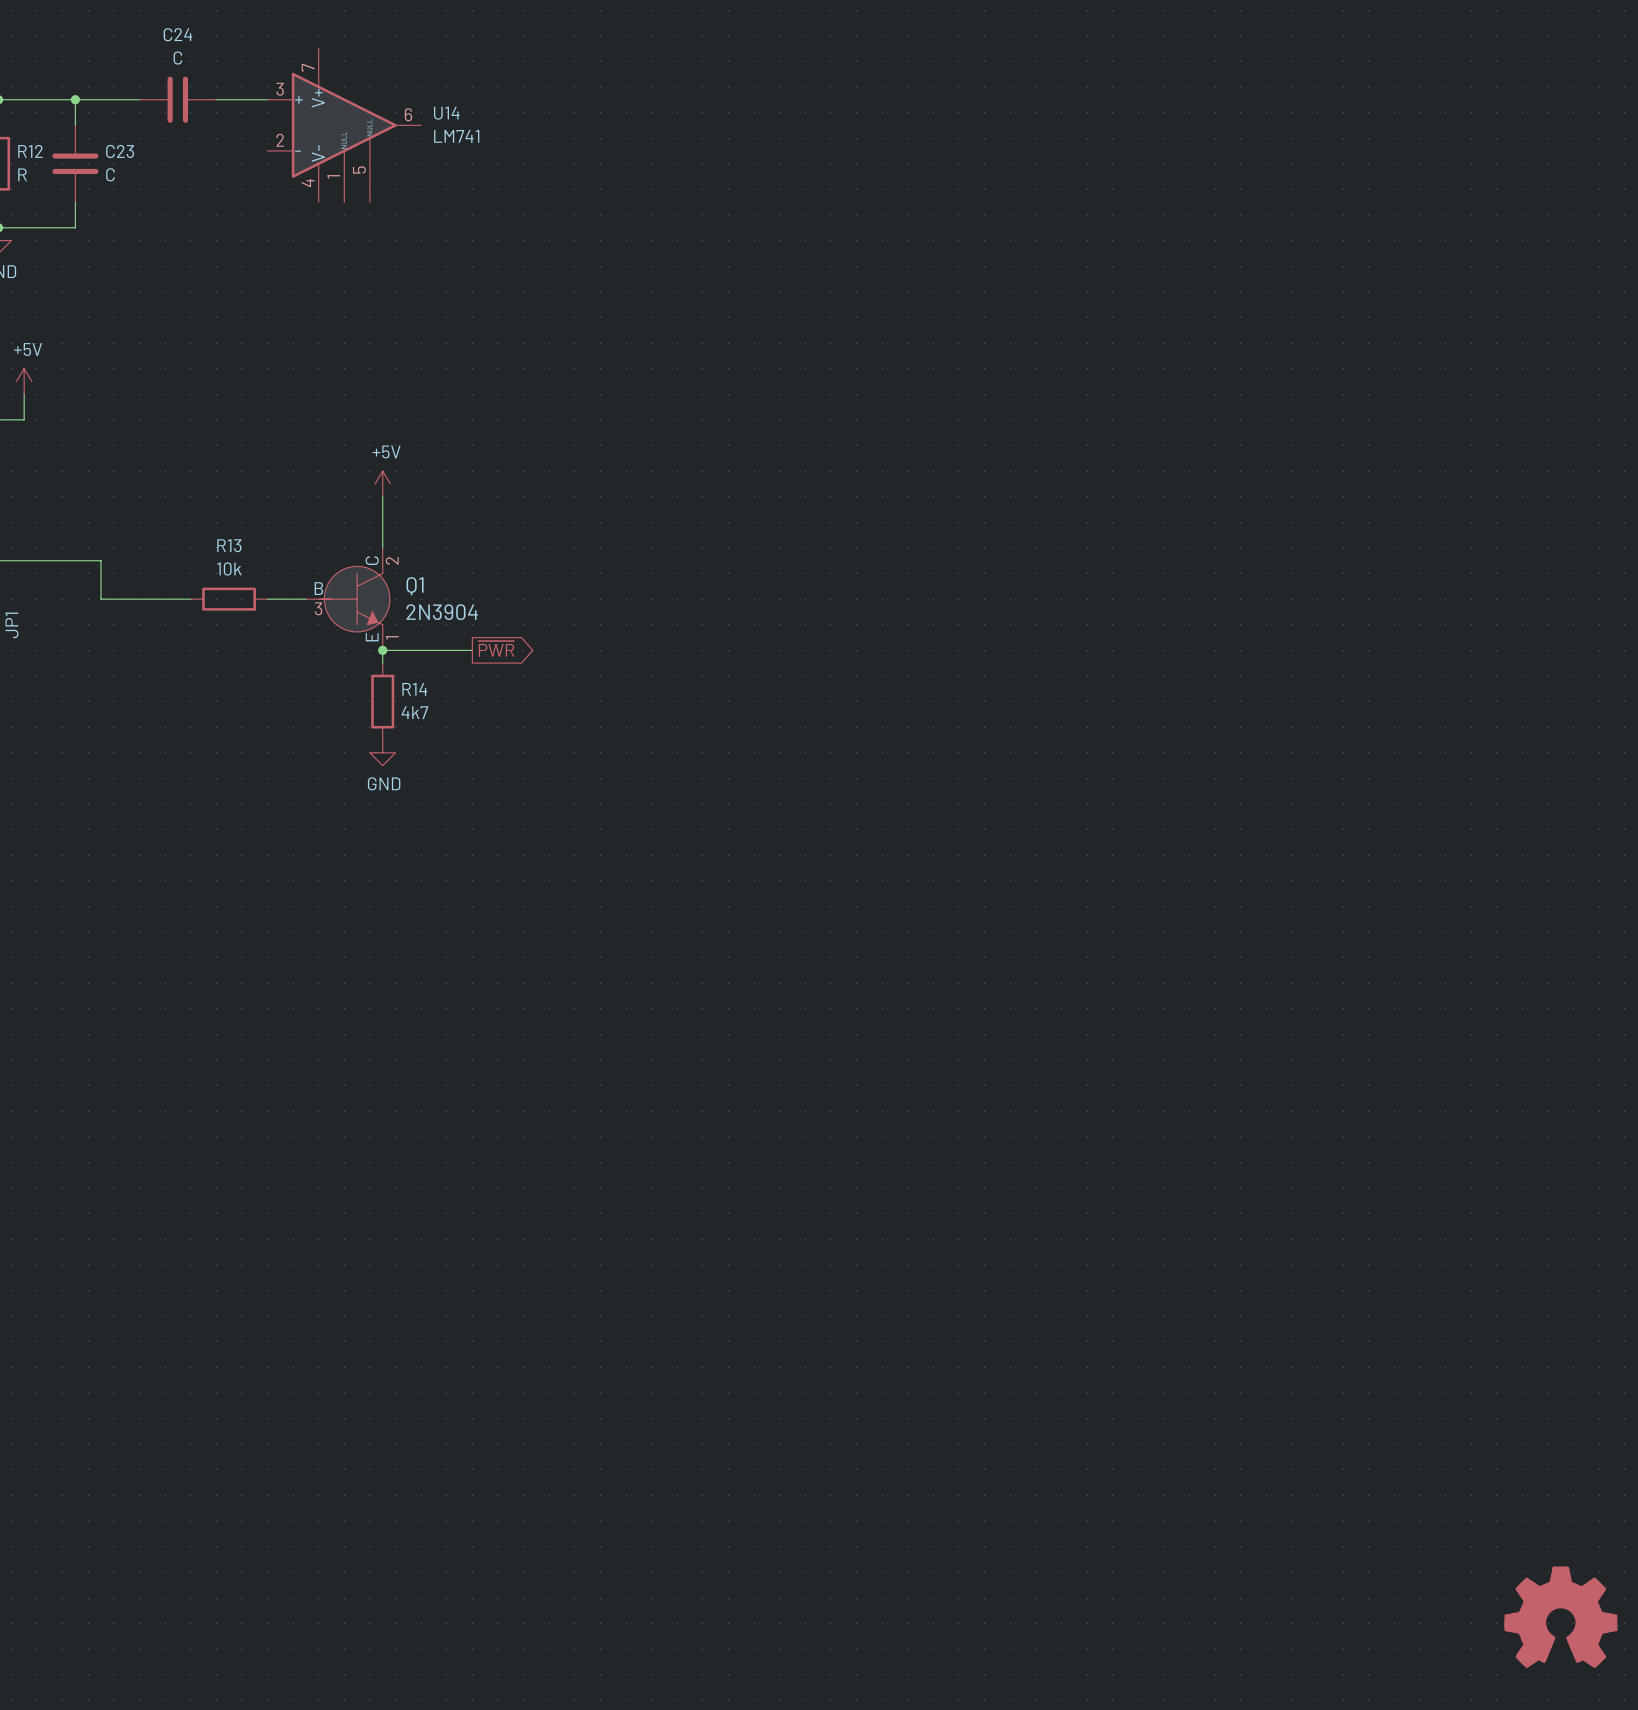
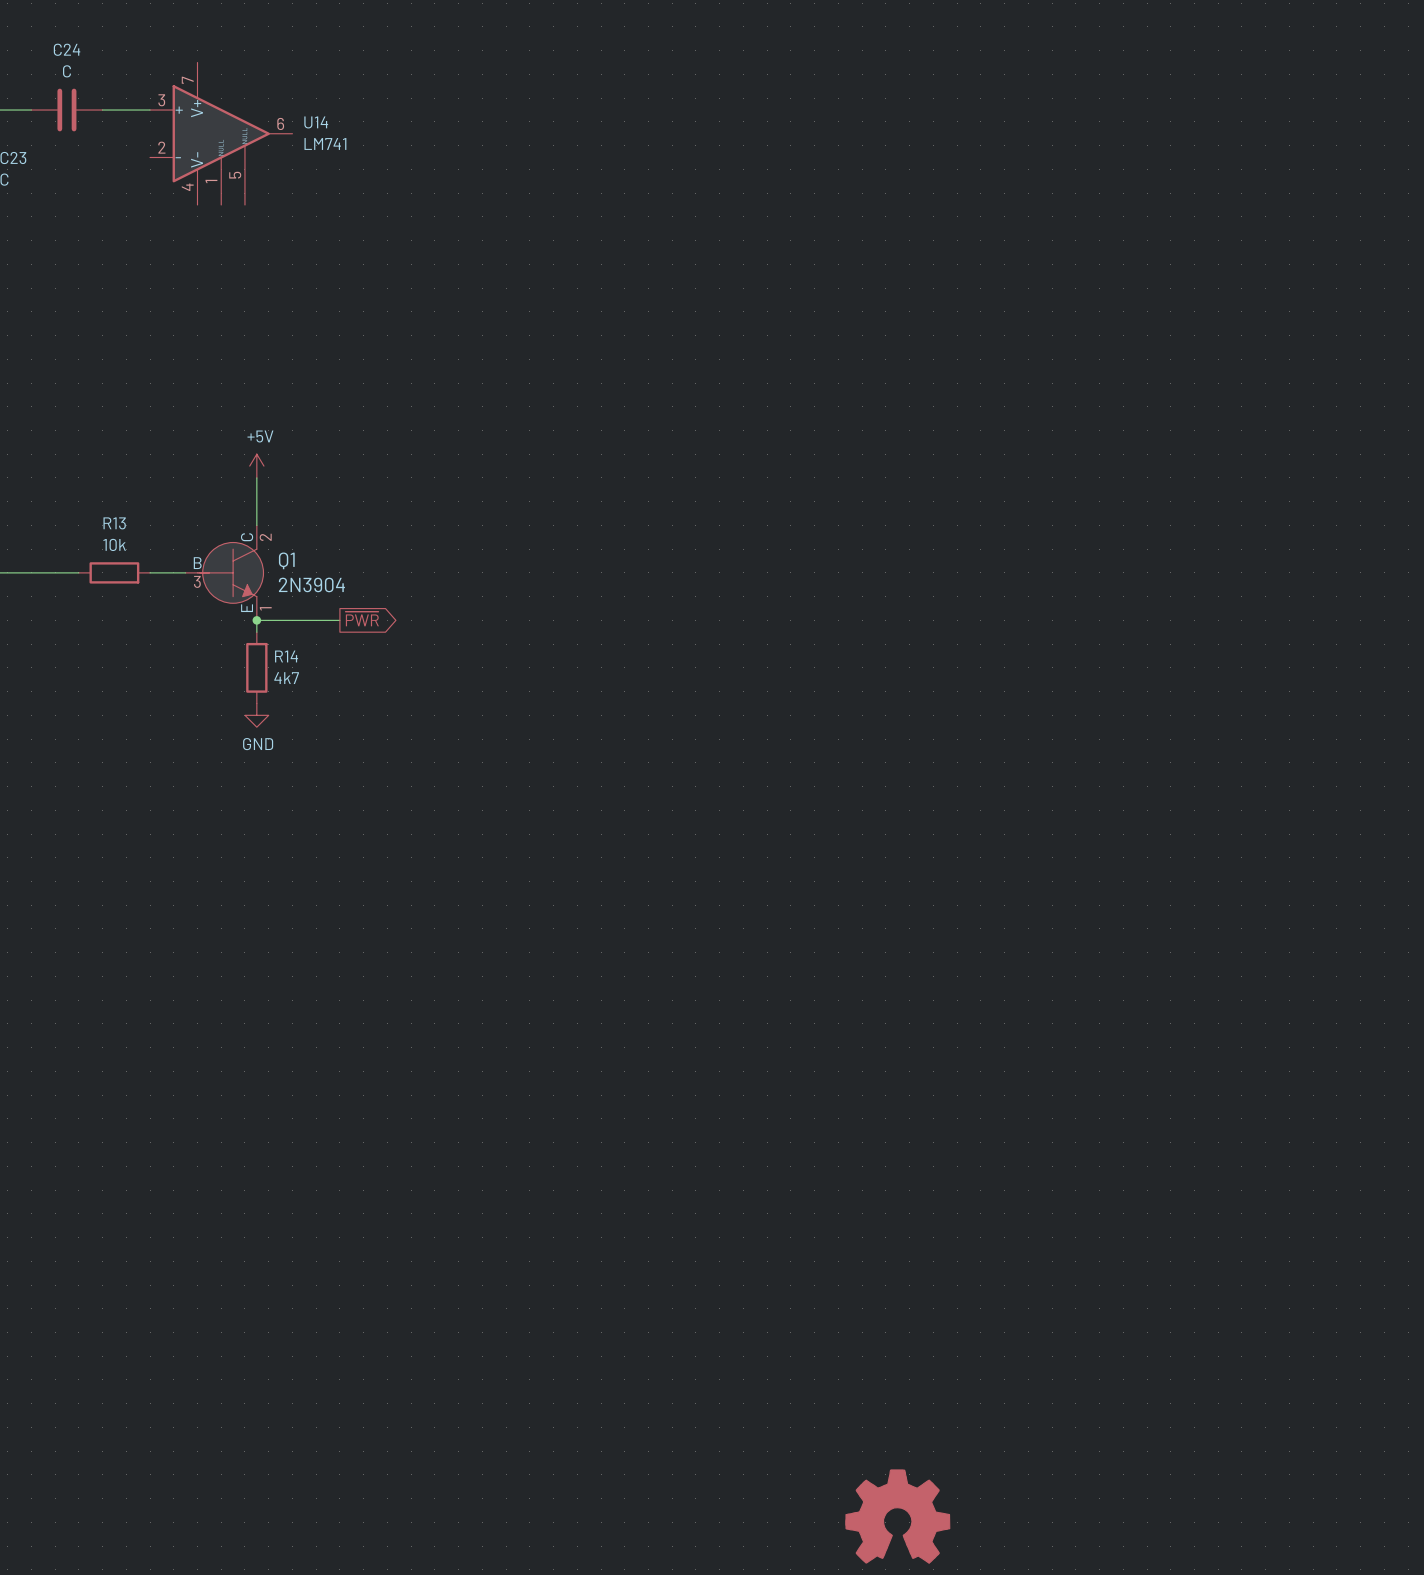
power symbol: none -> (897, 1516)
power symbol: (1560, 1617) -> none

